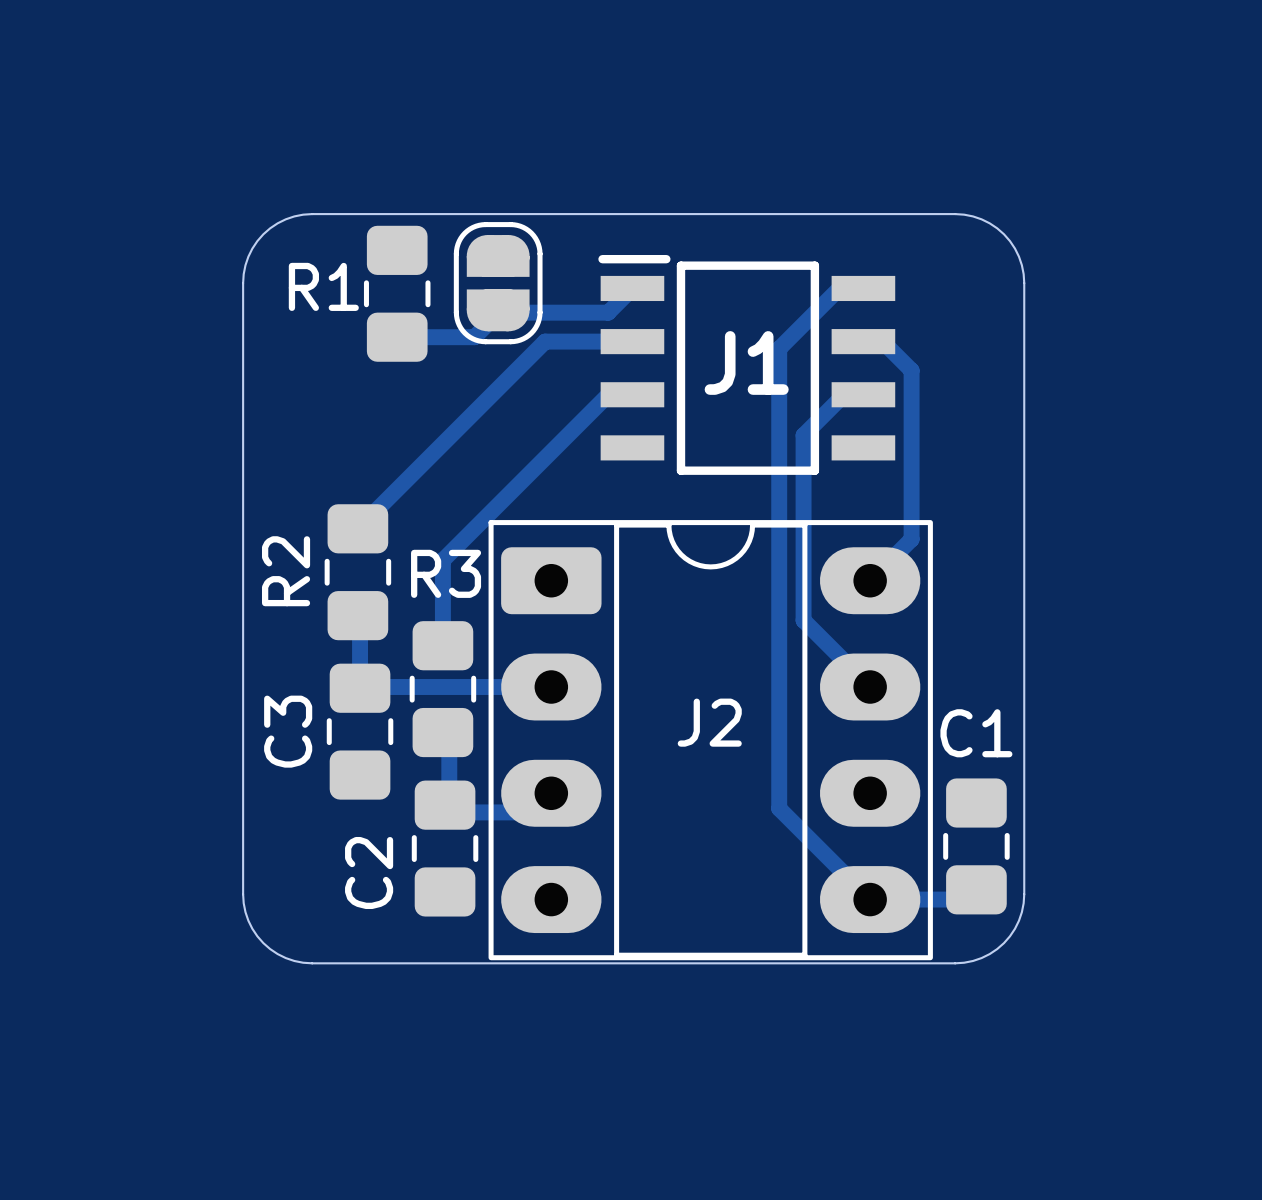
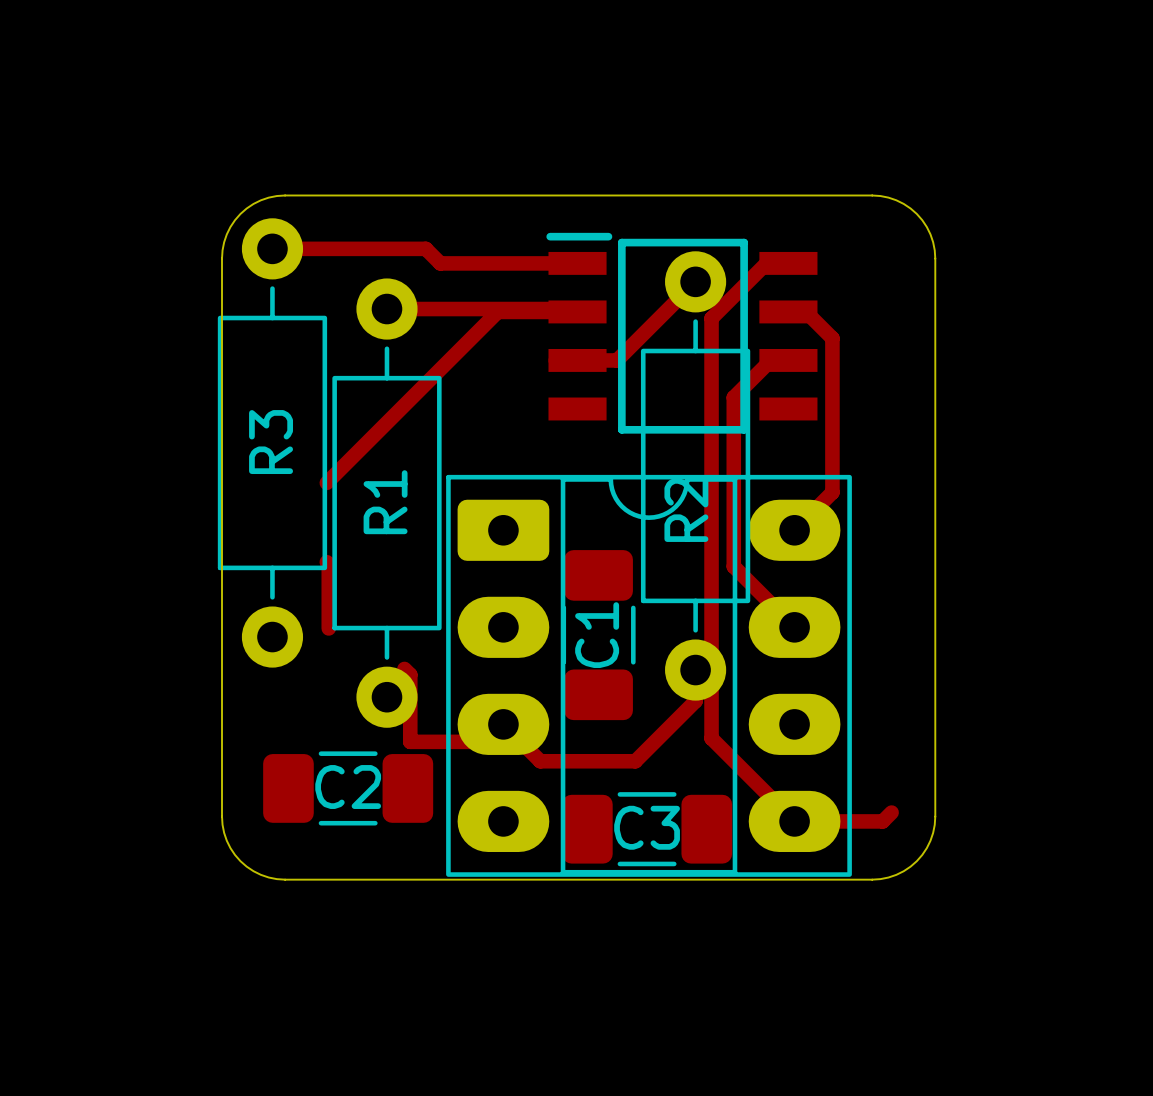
R1 footprint: [363, 225, 431, 362] -> [332, 278, 442, 728]
part: (498, 283) -> none
track: (632, 288) (608, 312) (499, 312) (474, 337) (397, 337) -> (577, 263) (440, 263) (425, 248) (272, 248)
track: none -> (695, 281) (616, 360) (577, 360)
track: none -> (386, 309) (574, 309)
J1 name: J1 (746, 362) -> none
track: (608, 394) (442, 560) (442, 645) -> none
R2 footprint: [324, 504, 392, 641] -> [640, 251, 751, 701]
R3 name position: R3 (446, 573) -> R3 (271, 442)
R3 footprint: [409, 621, 477, 758] -> [217, 218, 328, 668]
C3 footprint: [326, 663, 394, 800] -> [562, 792, 733, 867]
track: (551, 687) (367, 687) (365, 689) -> none
J2 name: J2 (709, 722) -> none
track: none -> (695, 670) (695, 701) (635, 761) (540, 761) (503, 724)
C1 name position: C1 (976, 733) -> C1 (597, 635)
C1 footprint: [943, 778, 1010, 915] -> [561, 550, 636, 721]
C2 footprint: [411, 780, 479, 917] -> [263, 751, 434, 826]

